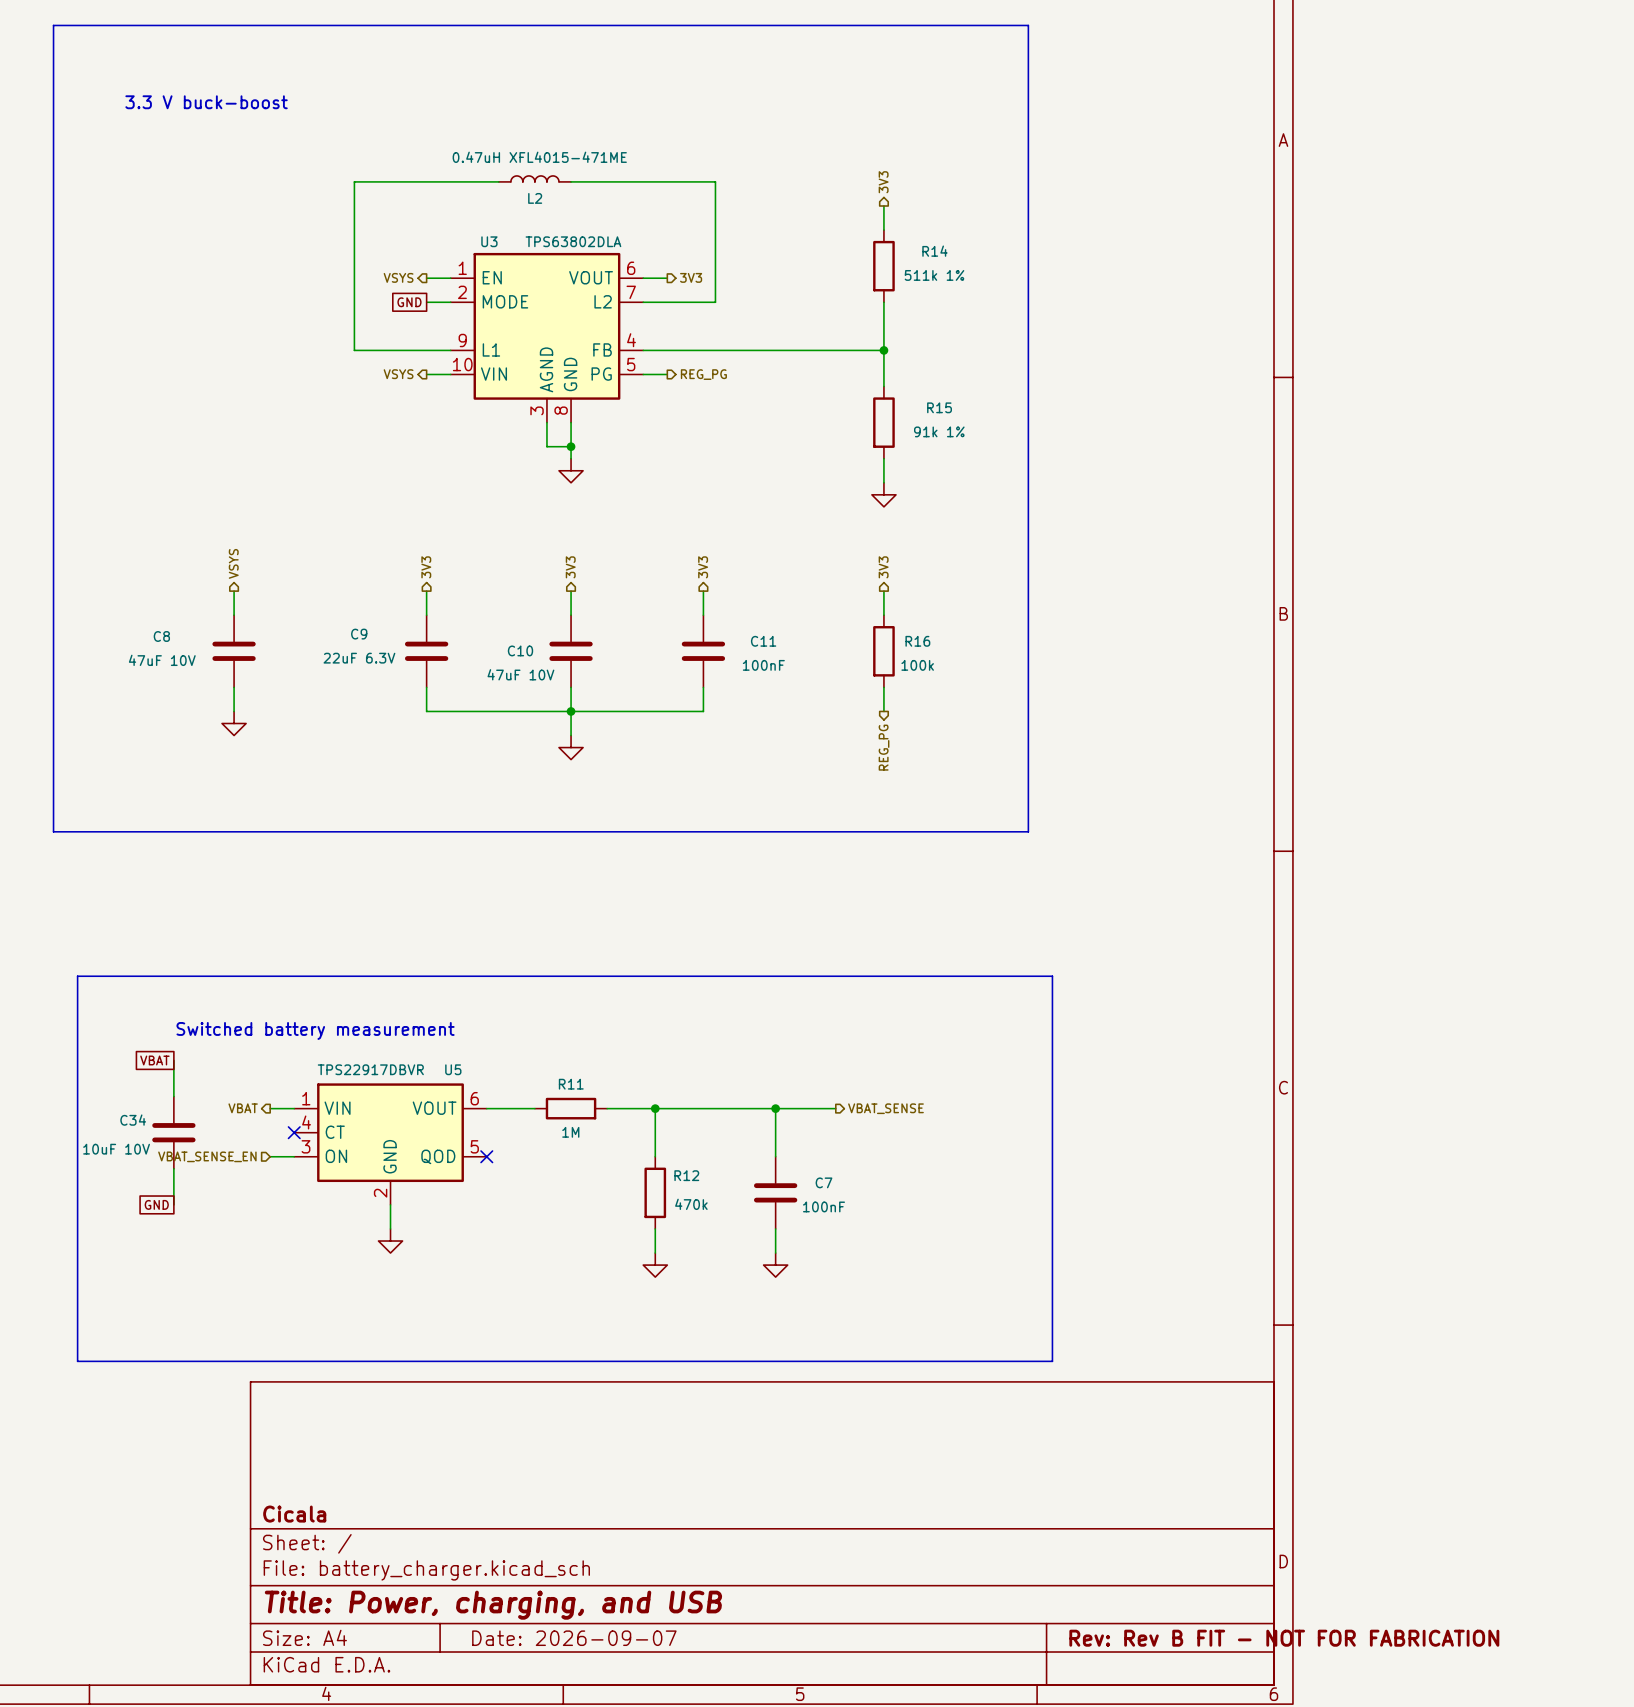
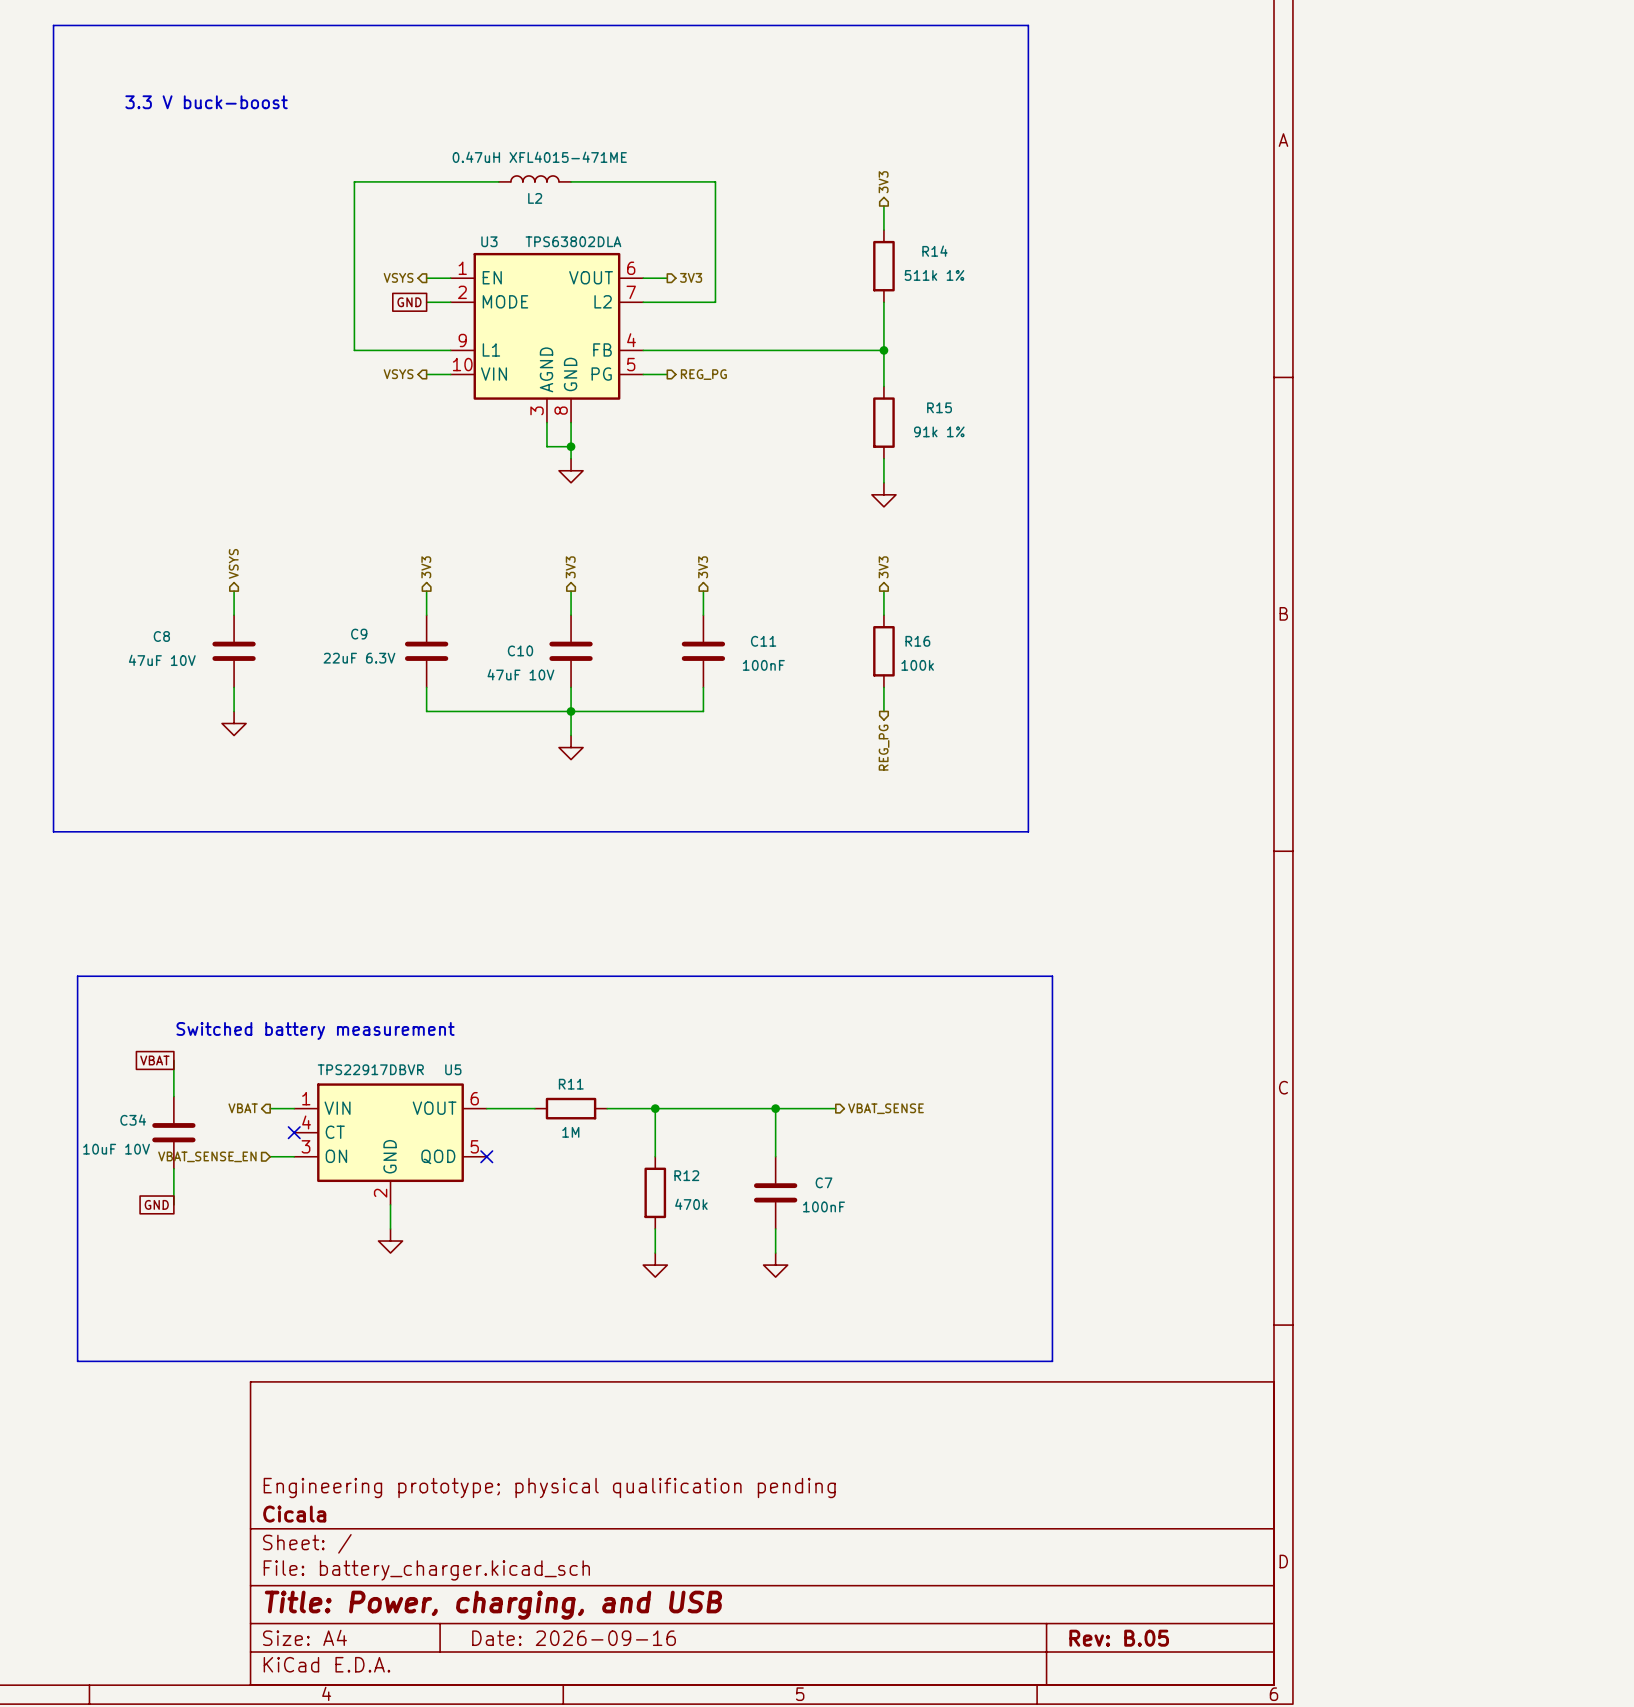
title block: none -> Engineering prototype; physical qualification pending (549, 1488)
title block: Date: 2026-09-07 (574, 1638) -> Date: 2026-09-16 (574, 1638)
title block: Rev: Rev B FIT - NOT FOR FABRICATION (1284, 1638) -> Rev: B.05 (1119, 1638)

